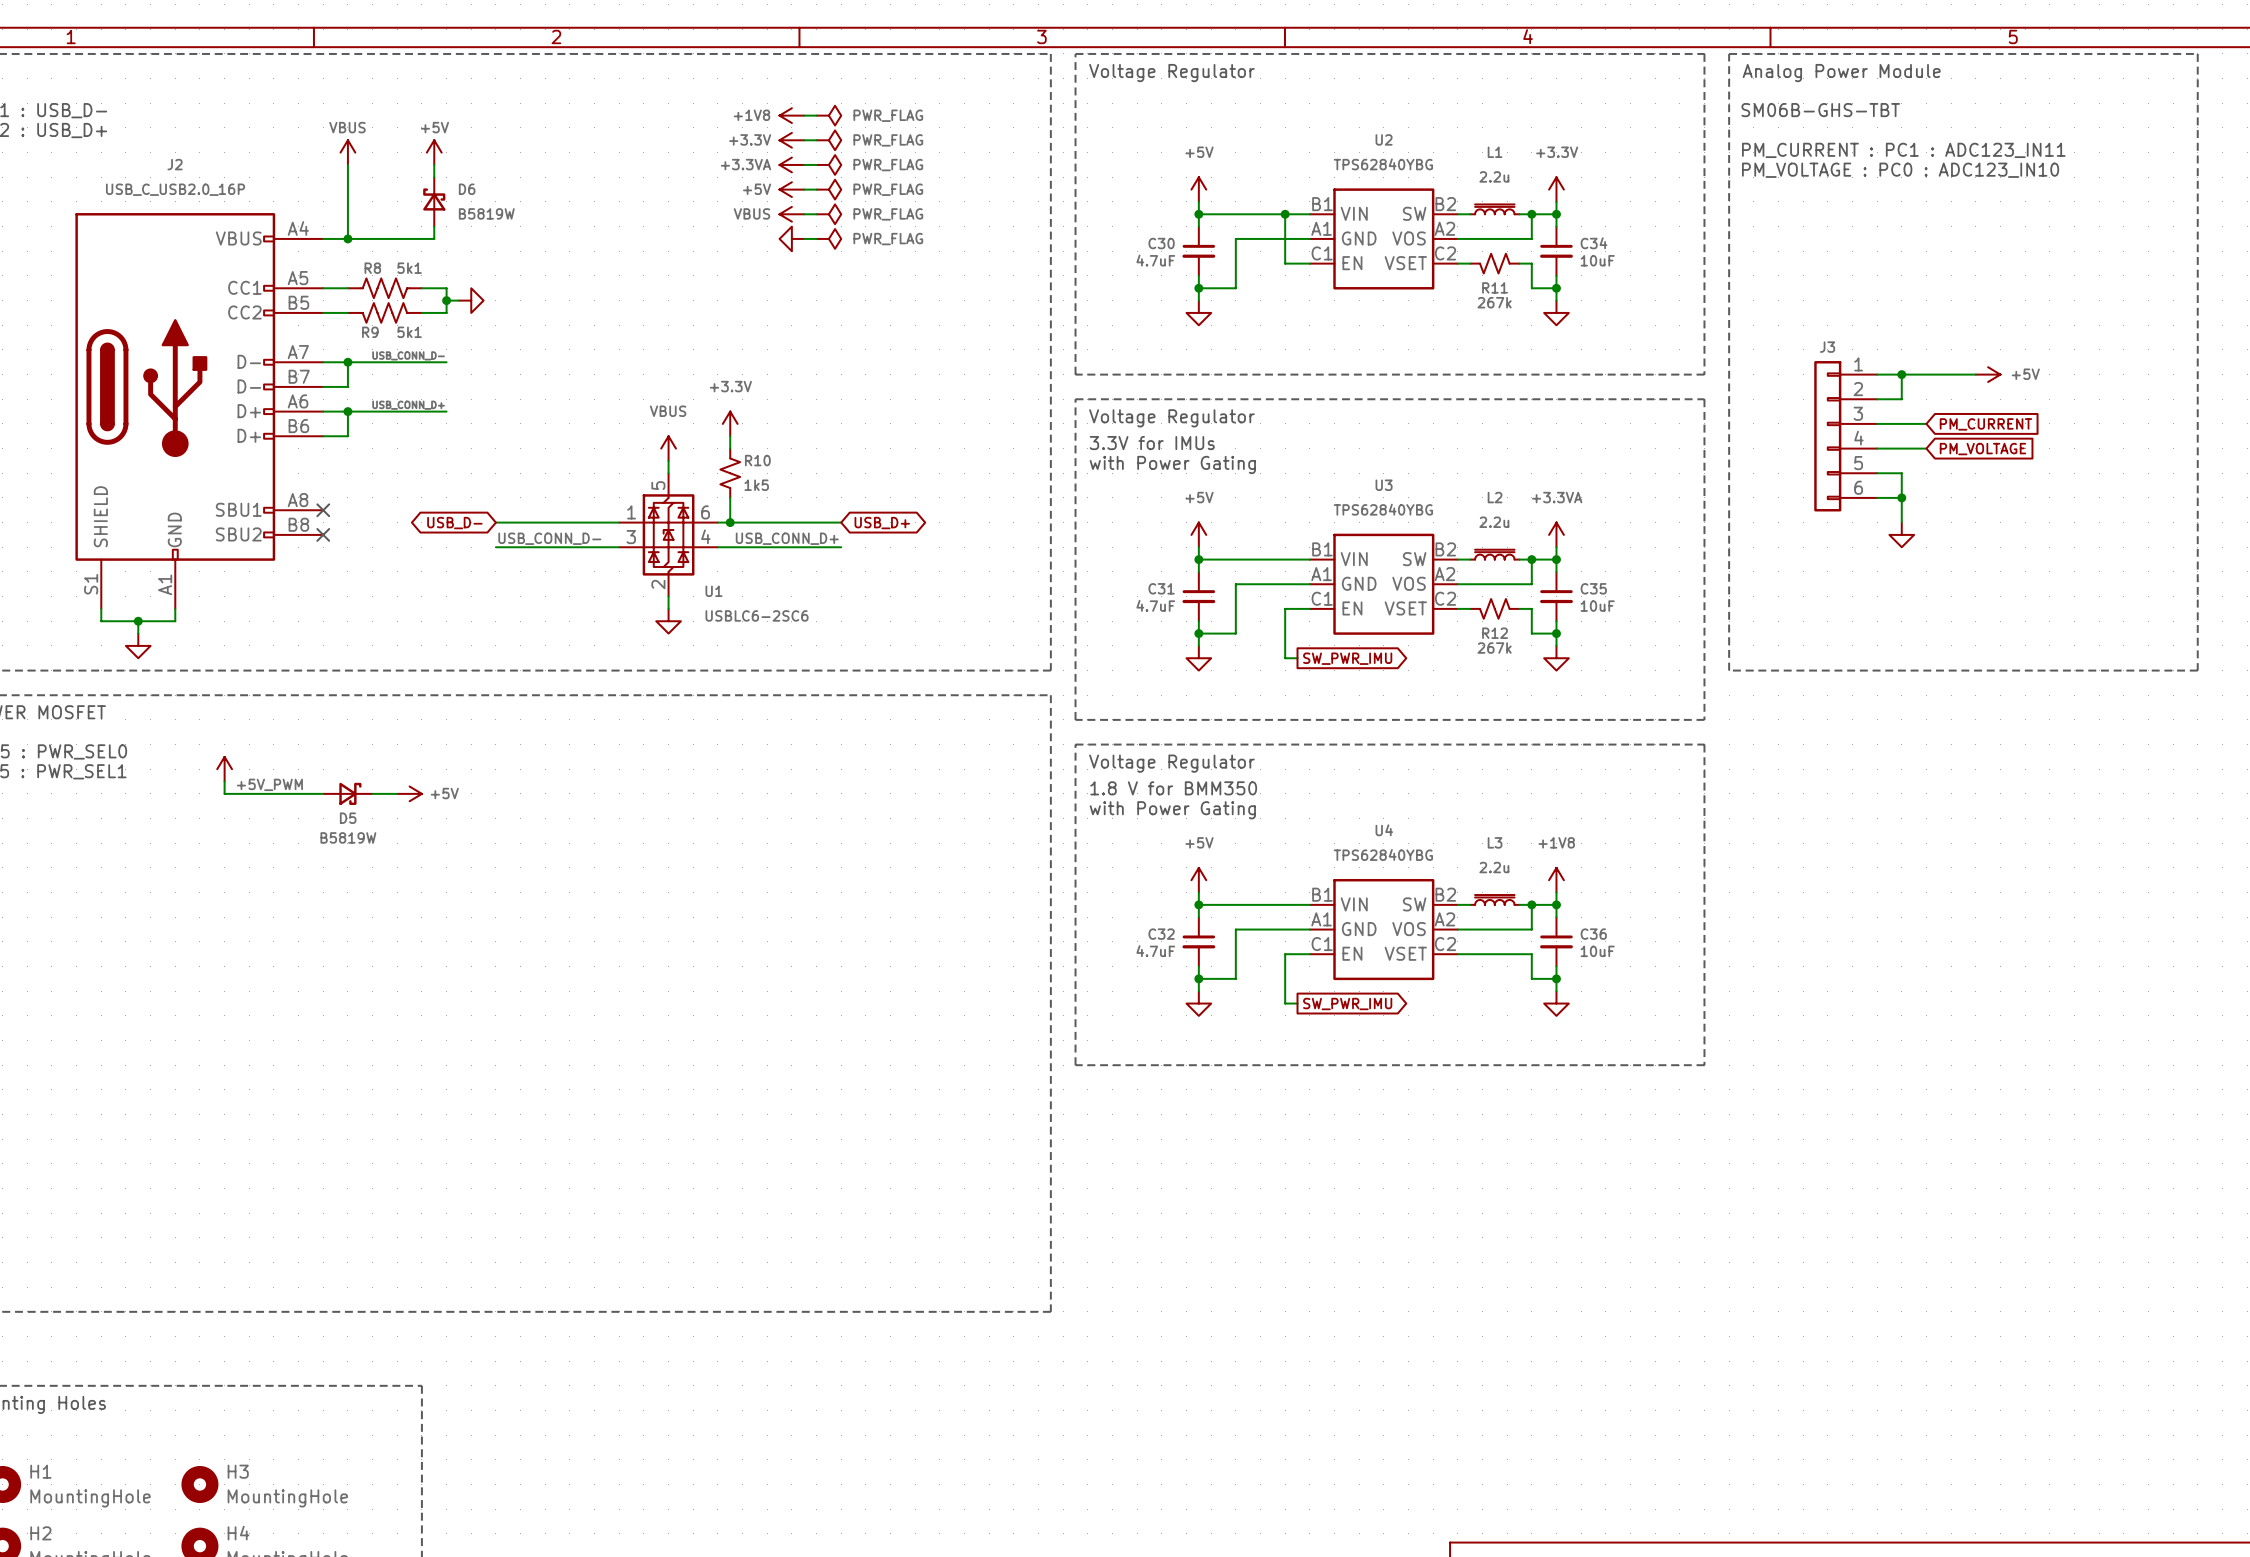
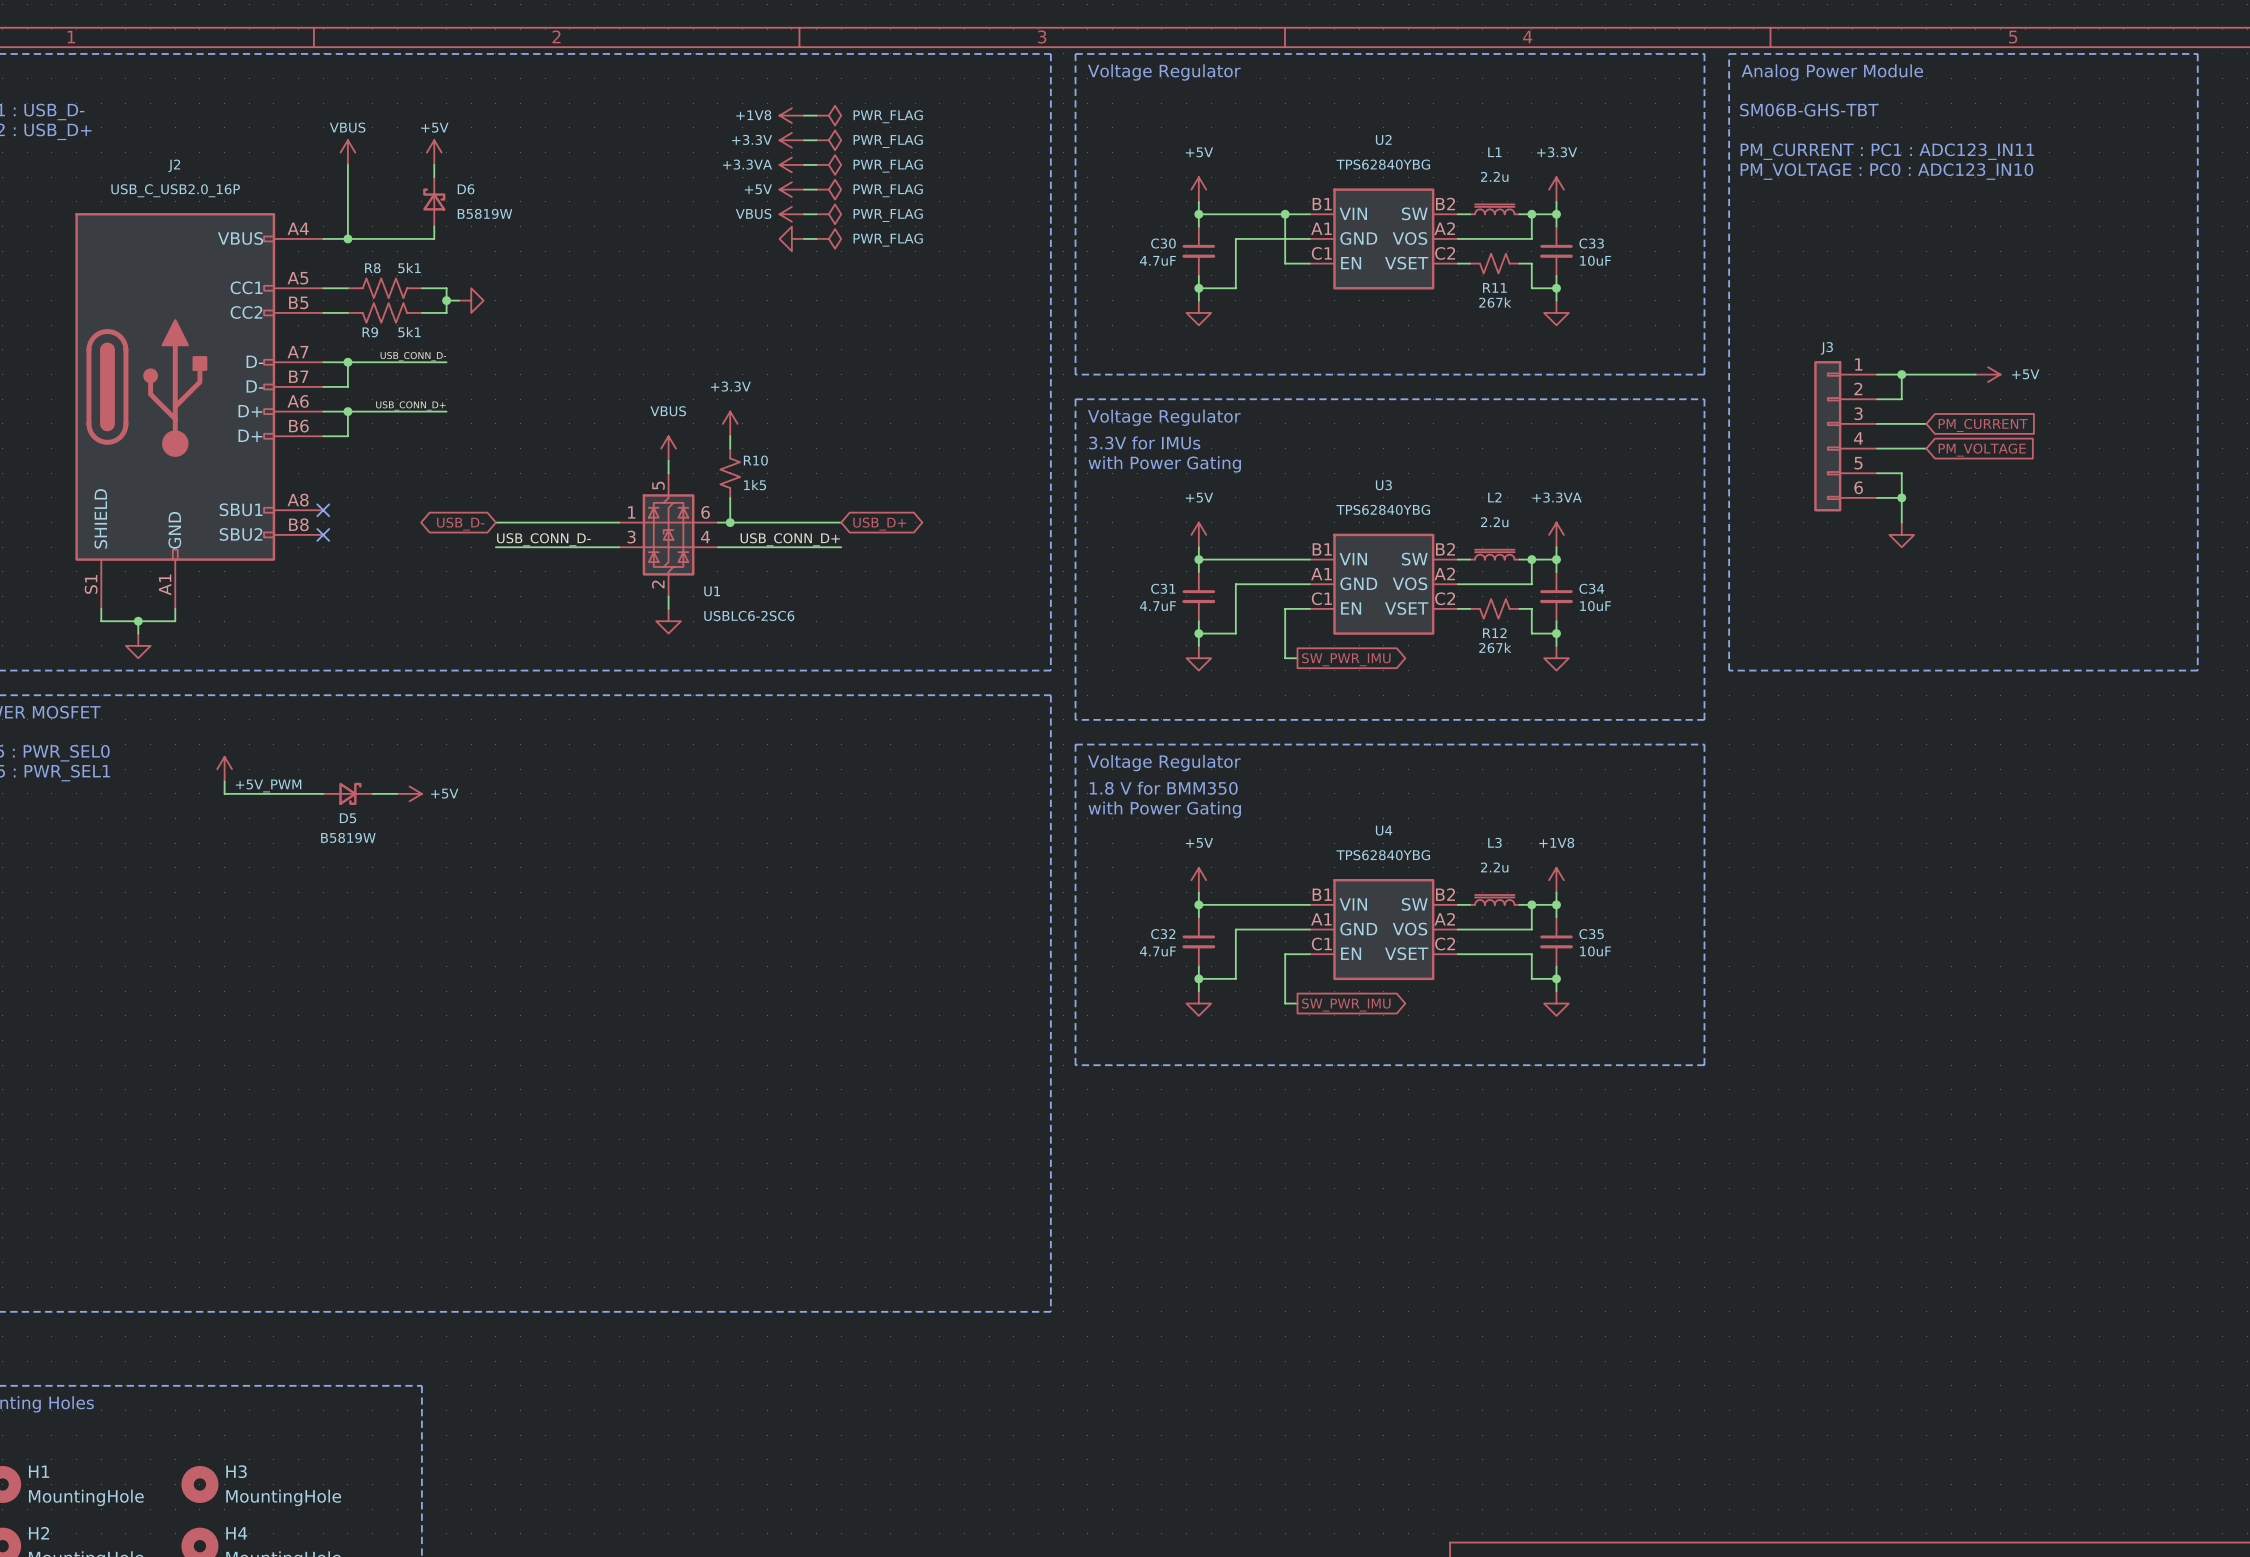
C34 name: C34 (1593, 243) -> C33 (1591, 243)
C35 name: C35 (1593, 588) -> C34 (1591, 588)
C36 name: C36 (1593, 934) -> C35 (1591, 934)

